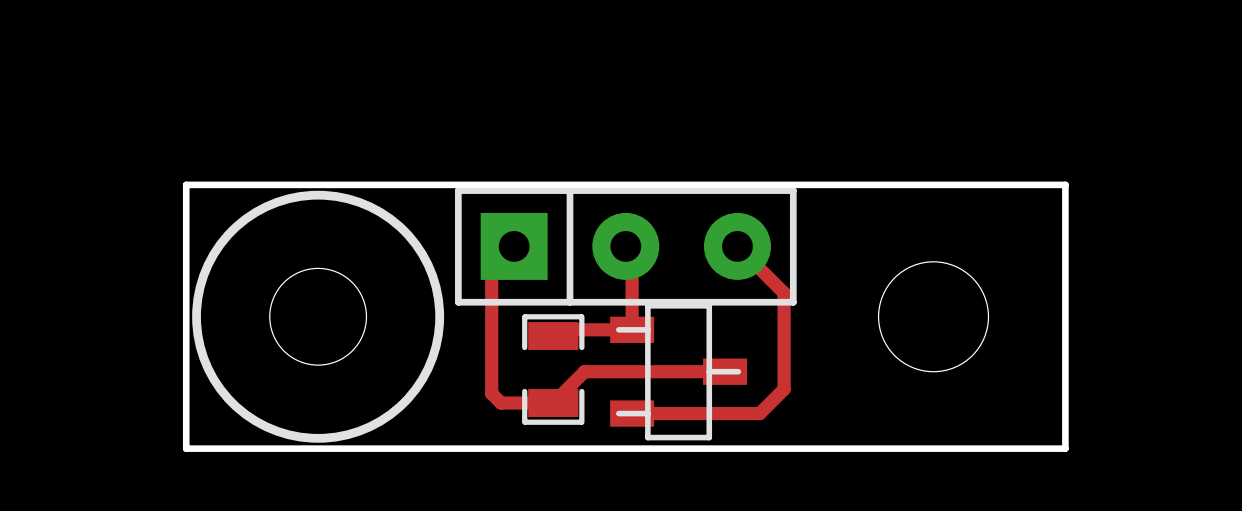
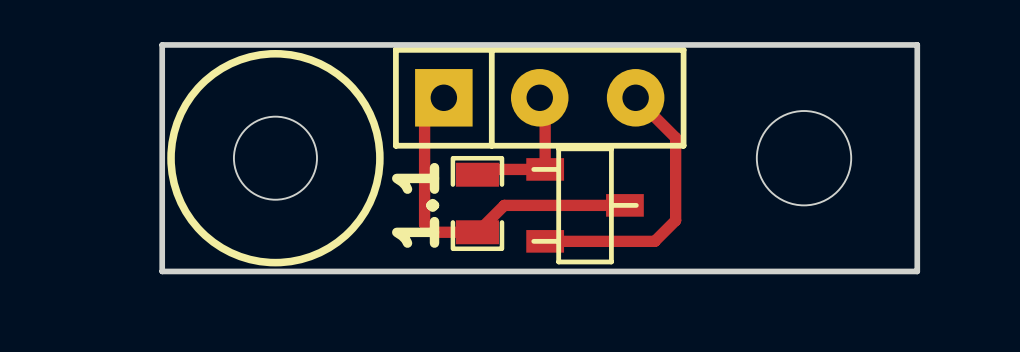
text: none -> 1.1 (415, 205)

